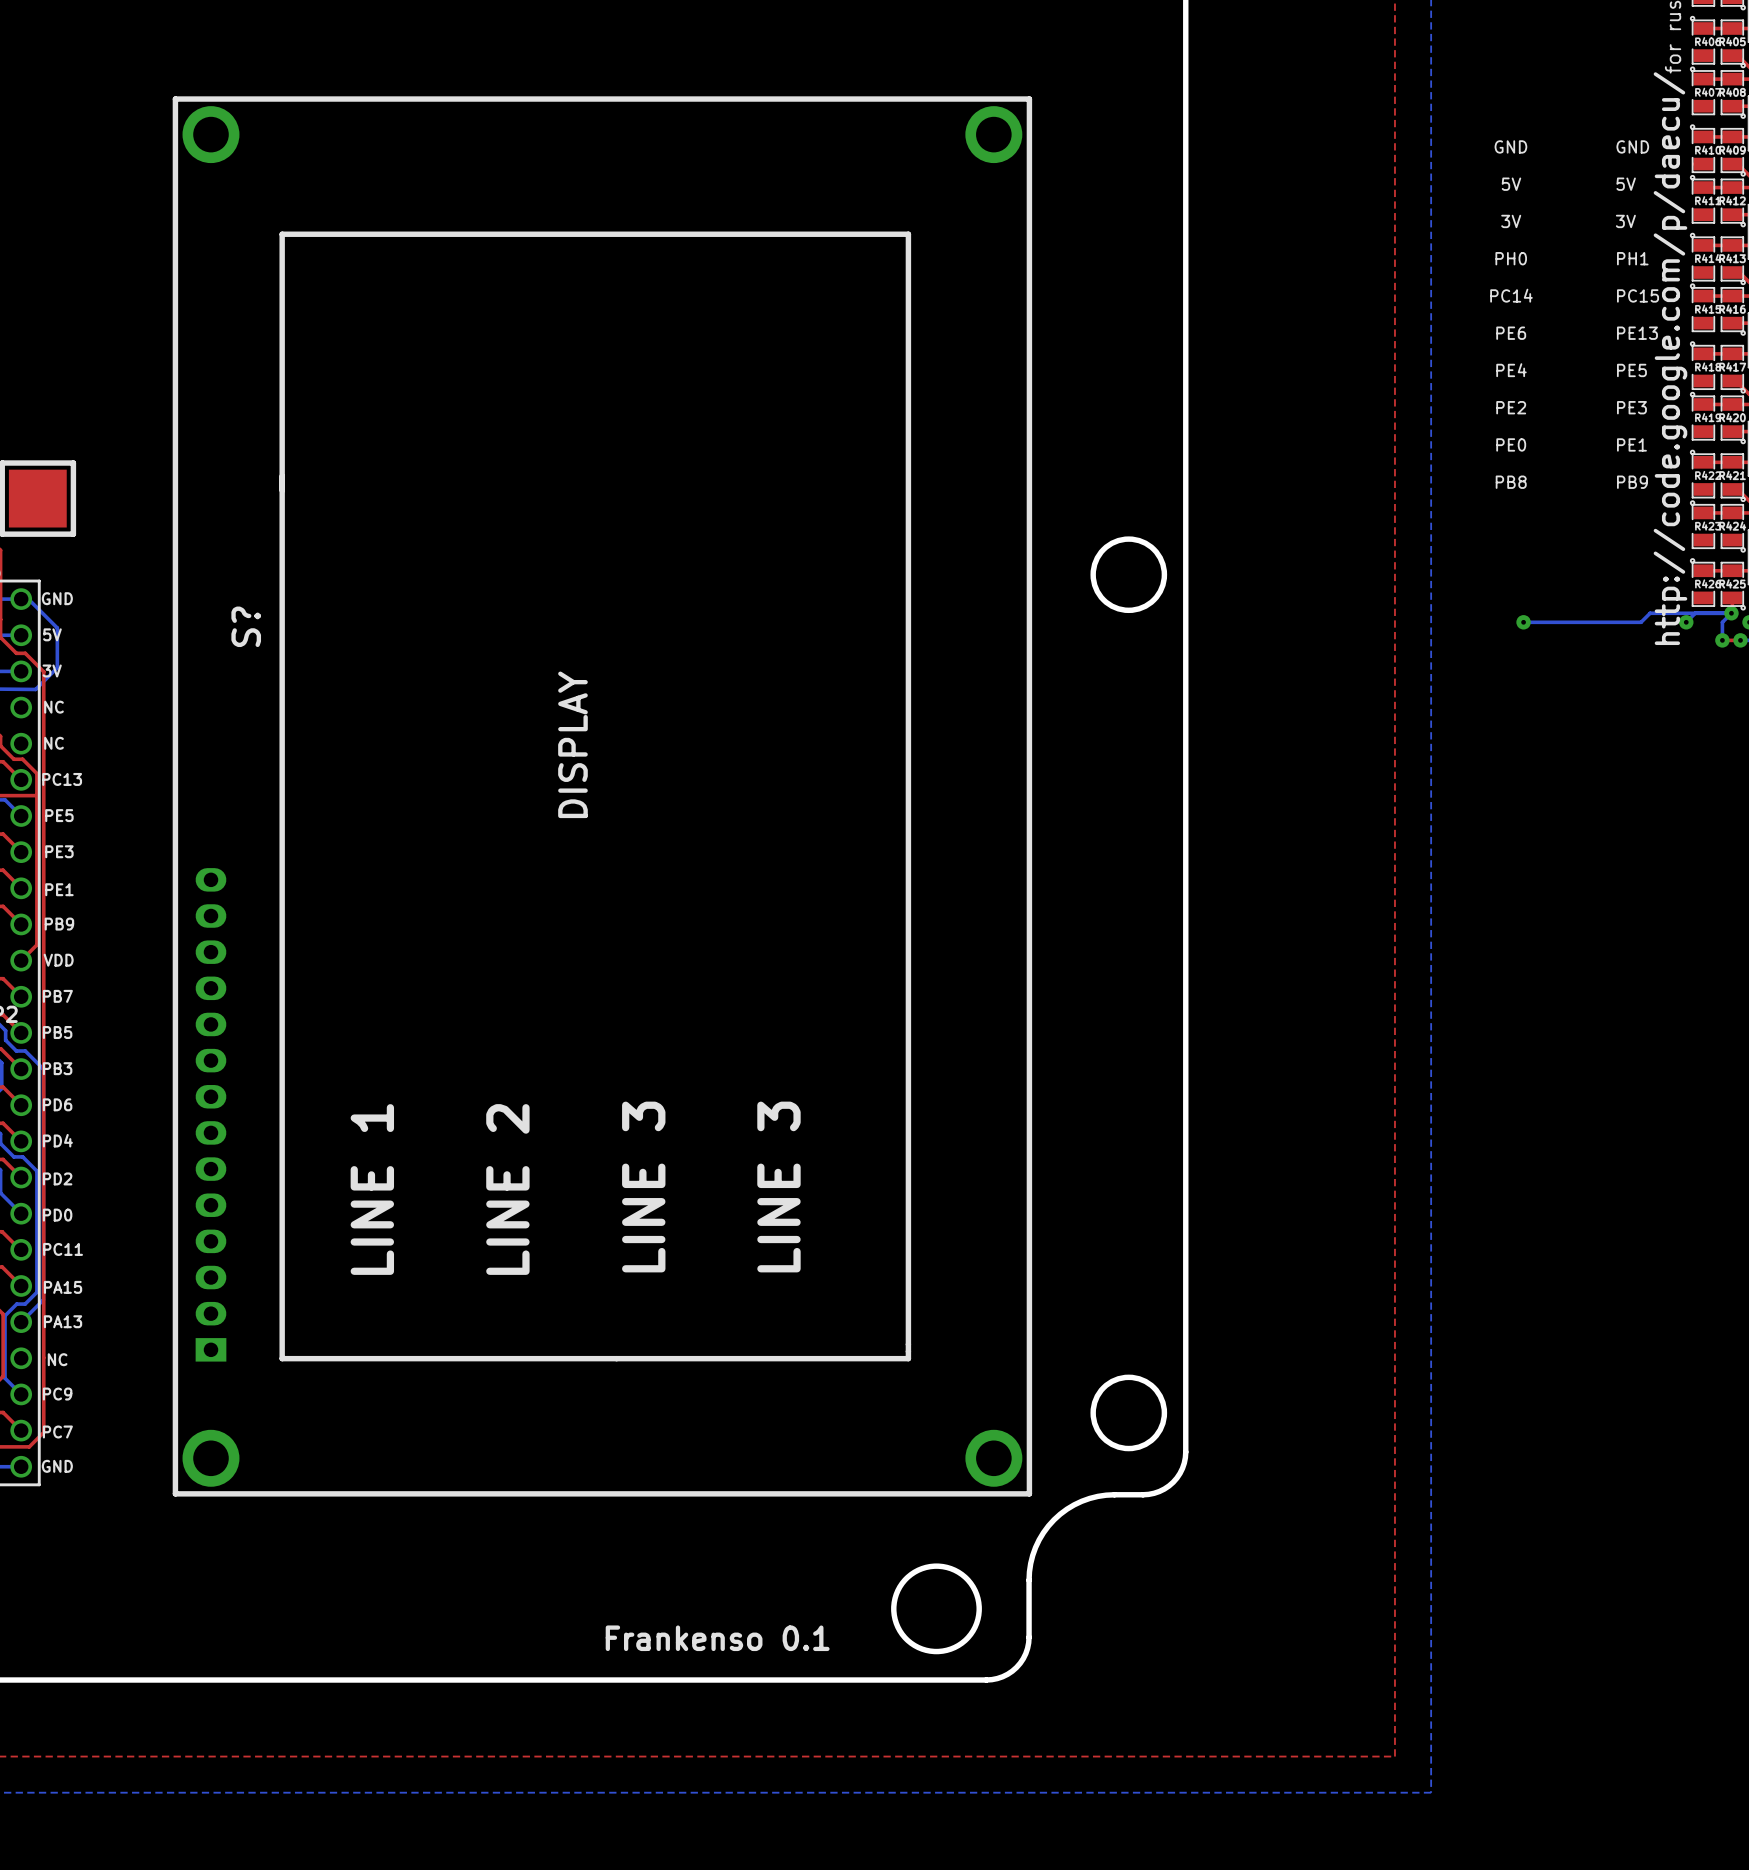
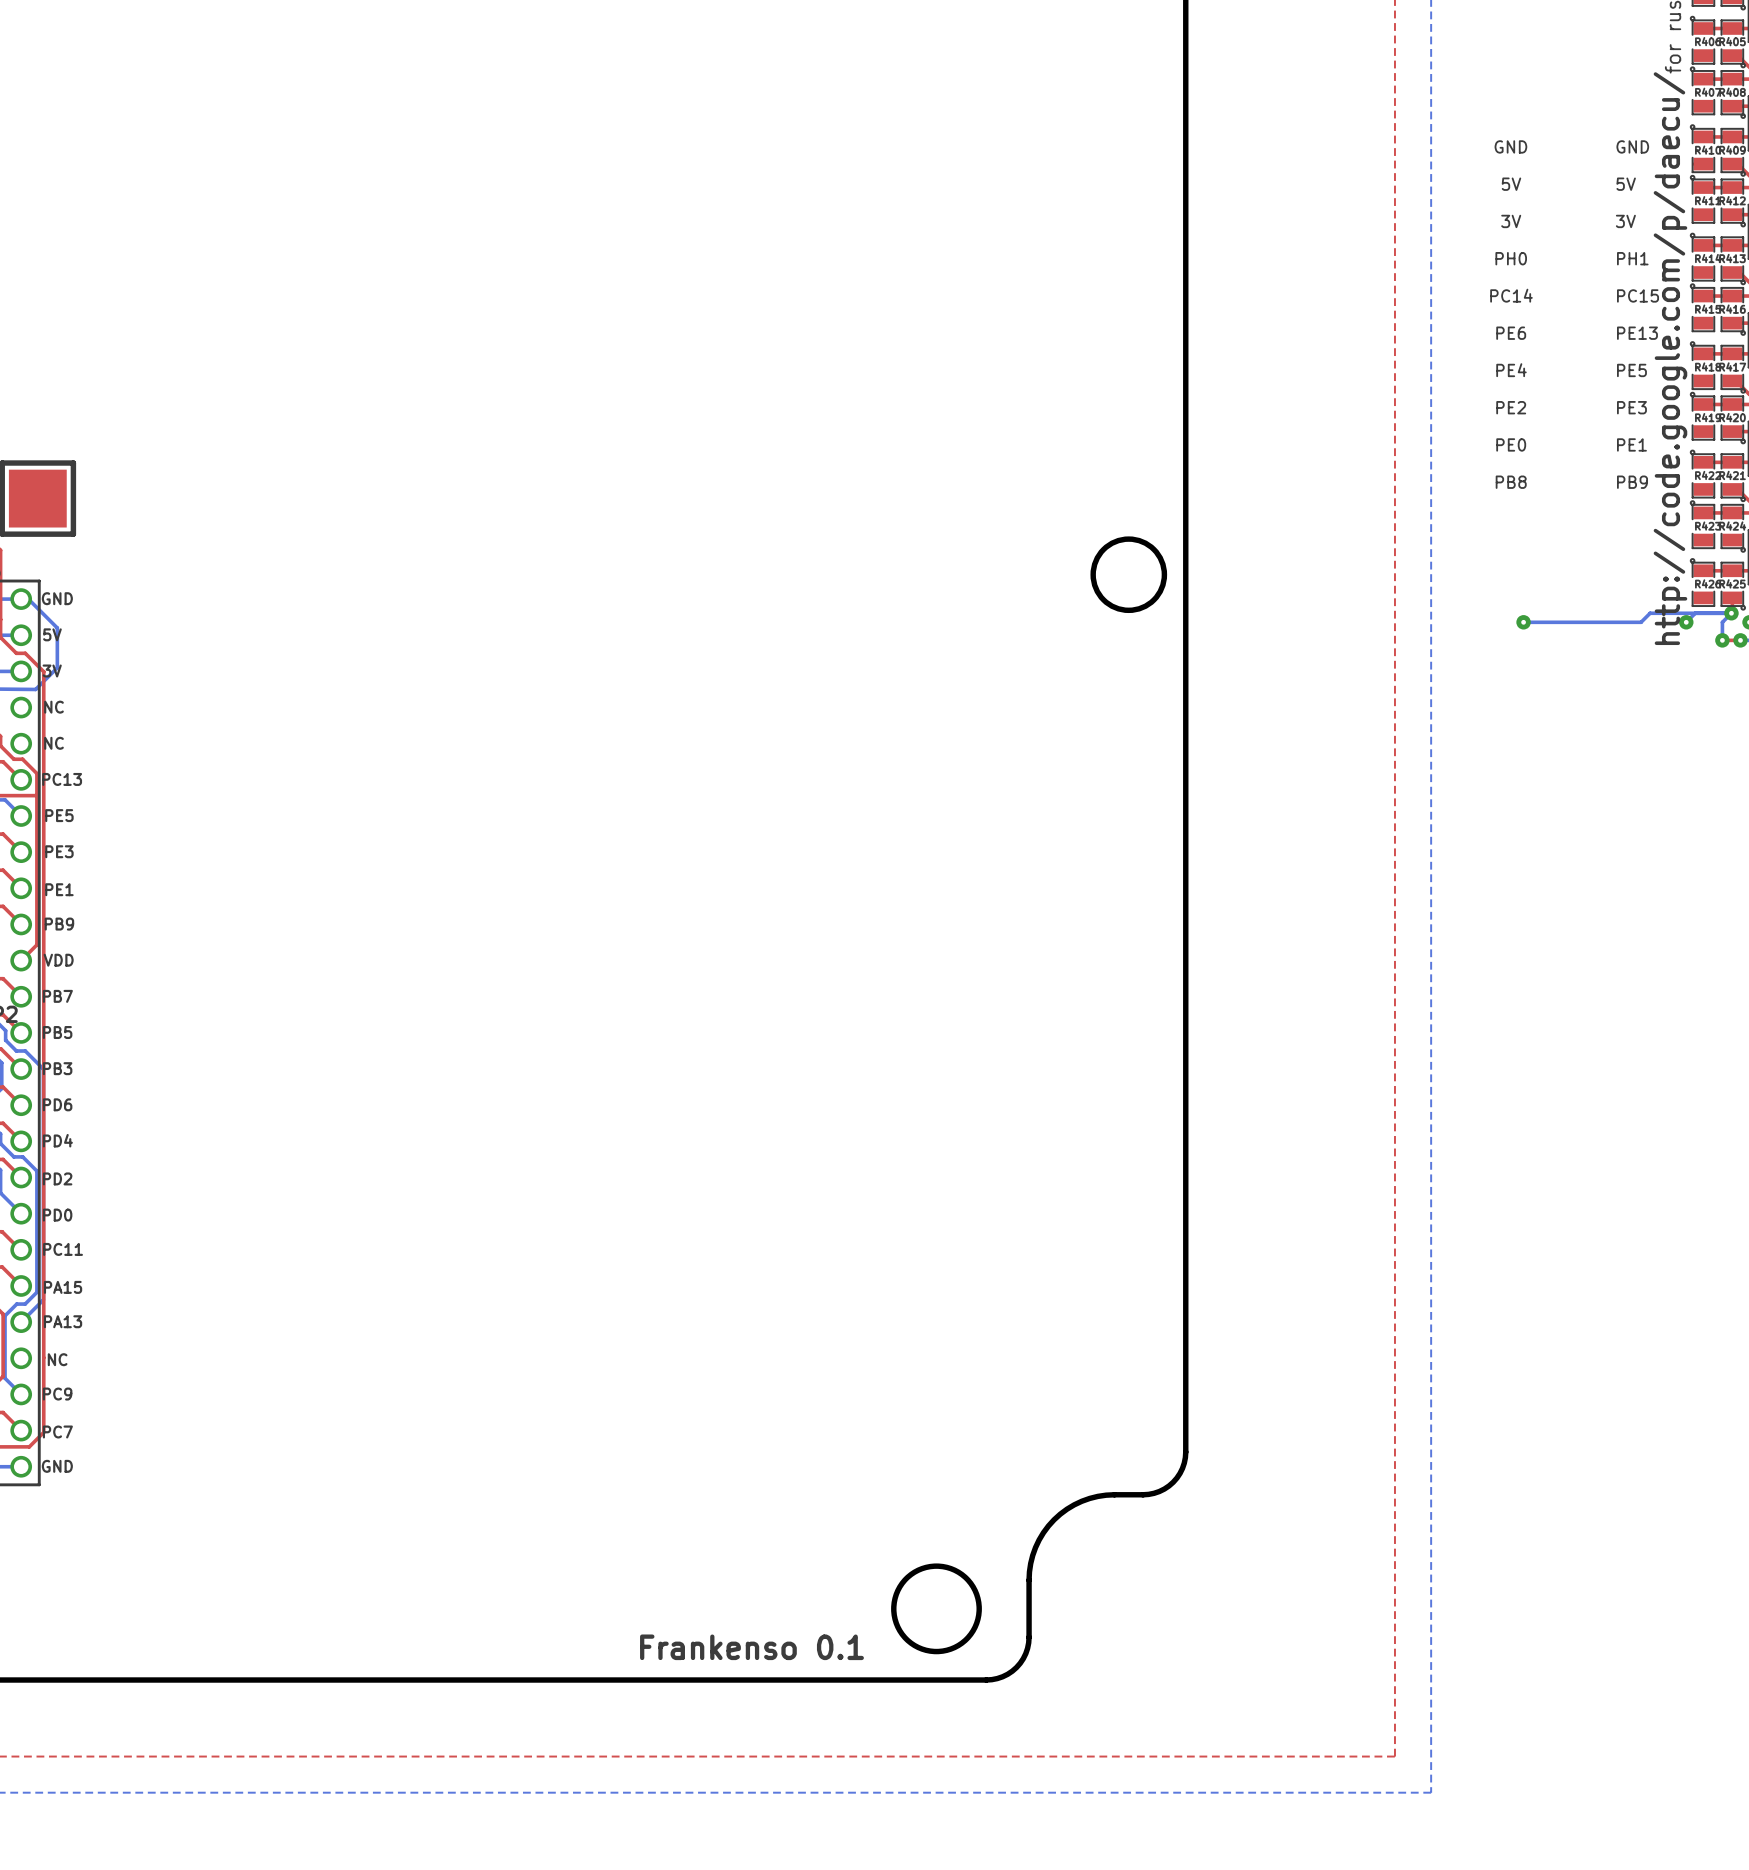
S?: DISPLAY (602, 796) -> none
round board edge: [1090, 1374, 1168, 1452] -> none
text position: Frankenso 0.1 (717, 1638) -> Frankenso 0.1 (751, 1647)

